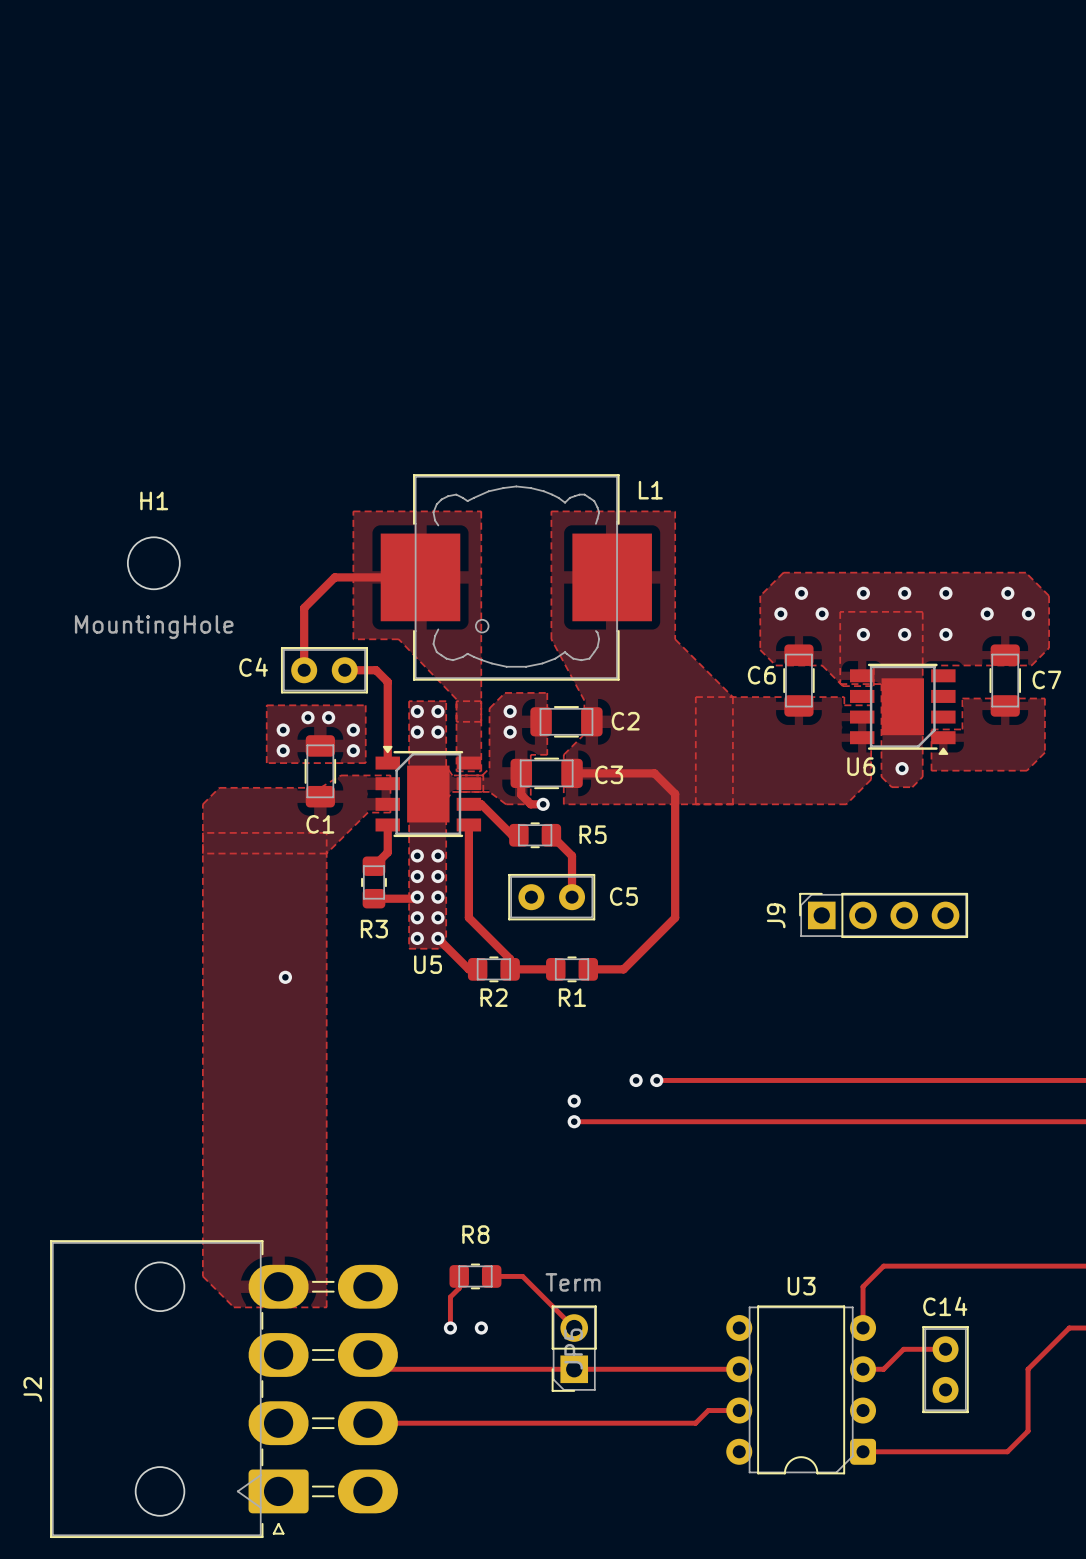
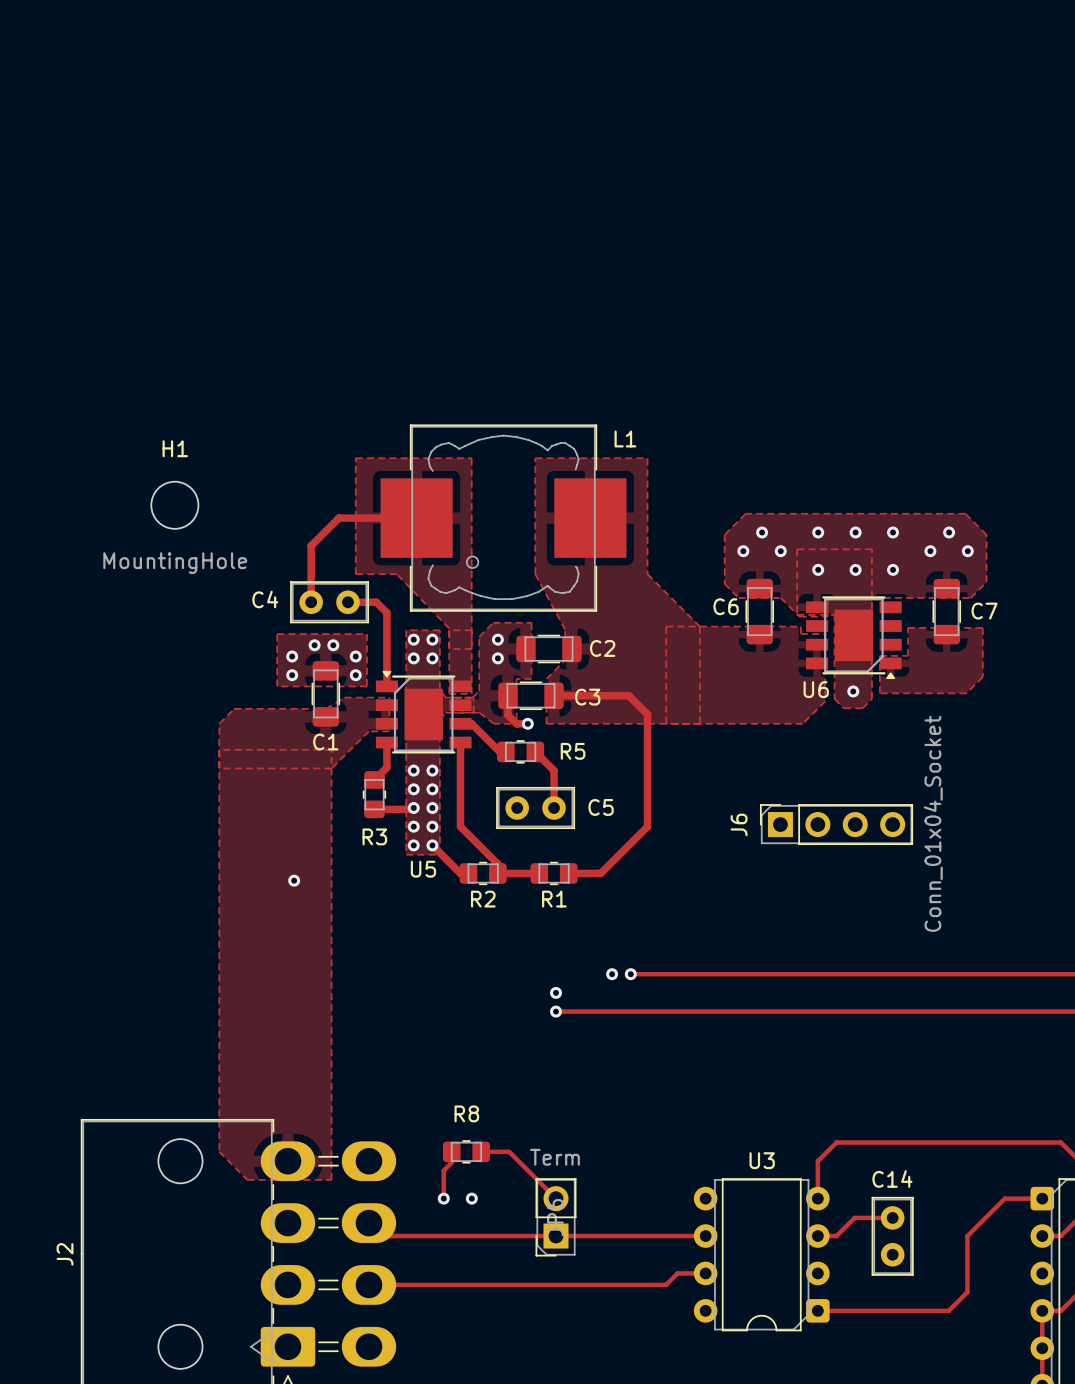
J9 value: none -> Conn_01x04_Socket (933, 823)
J9 name: J9 (776, 915) -> J6 (739, 824)

